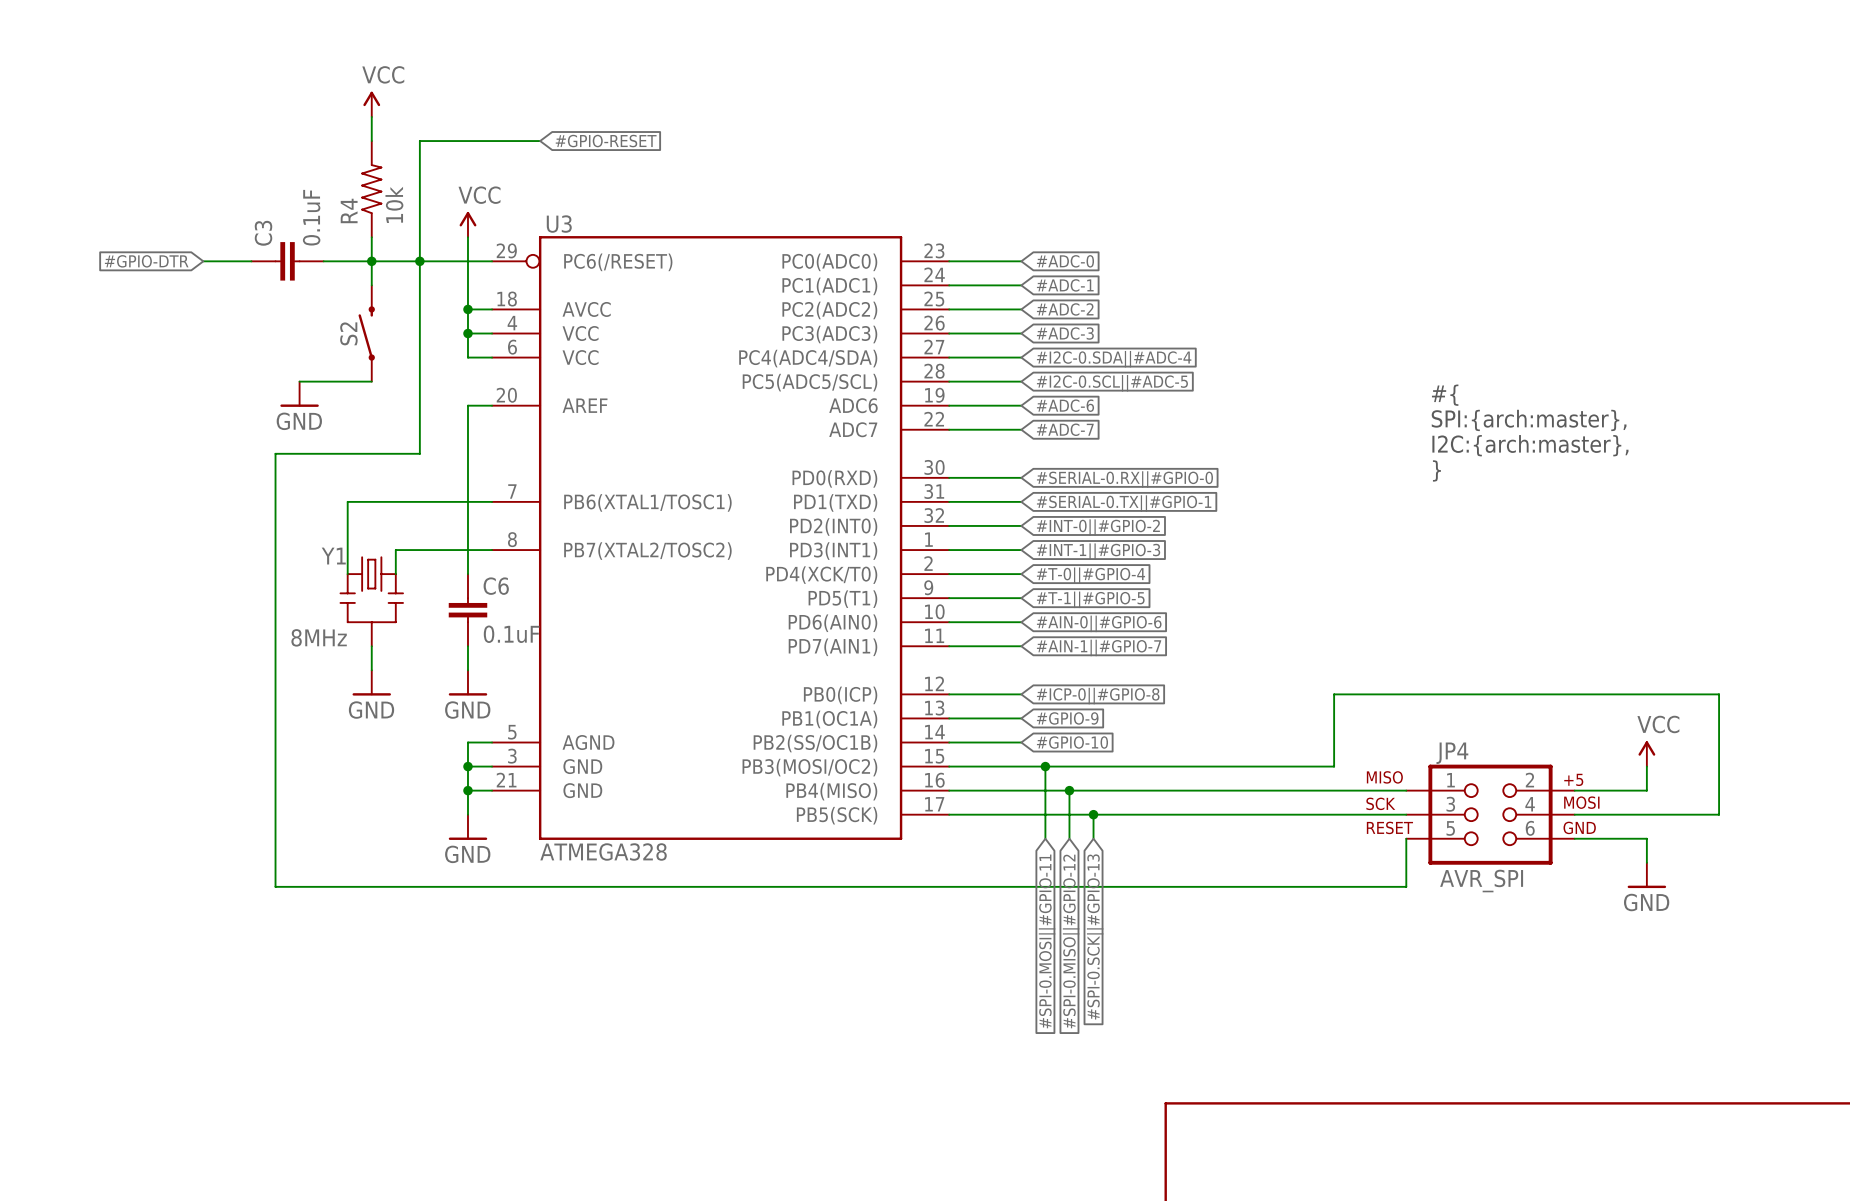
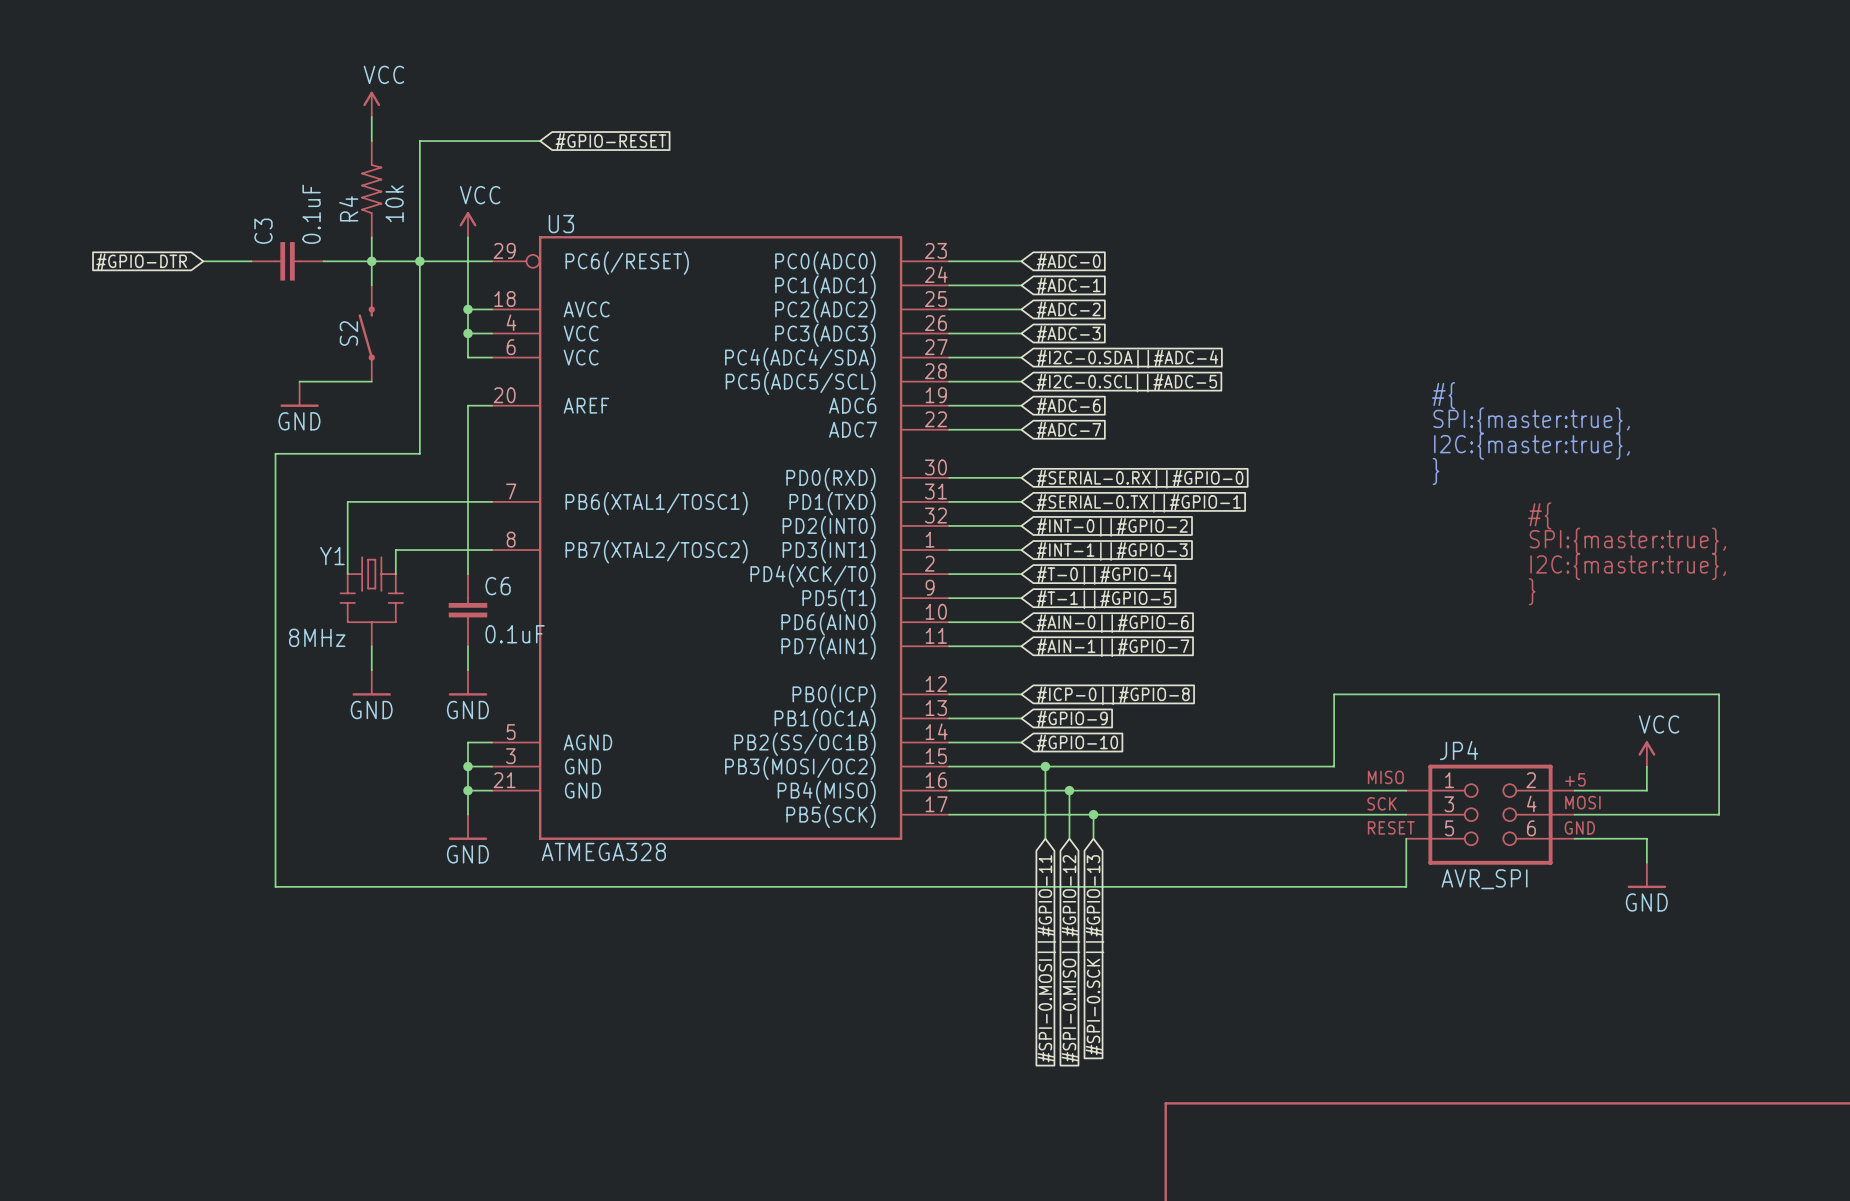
text: SPI:{arch:master}, (1529, 420) -> SPI:{master:true}, (1531, 420)
text: I2C:{arch:master}, (1530, 445) -> I2C:{master:true}, (1531, 446)
text: none -> #{ (1539, 515)
text: none -> SPI:{master:true}, (1627, 541)
text: none -> I2C:{master:true}, (1628, 566)
text: none -> } (1532, 591)

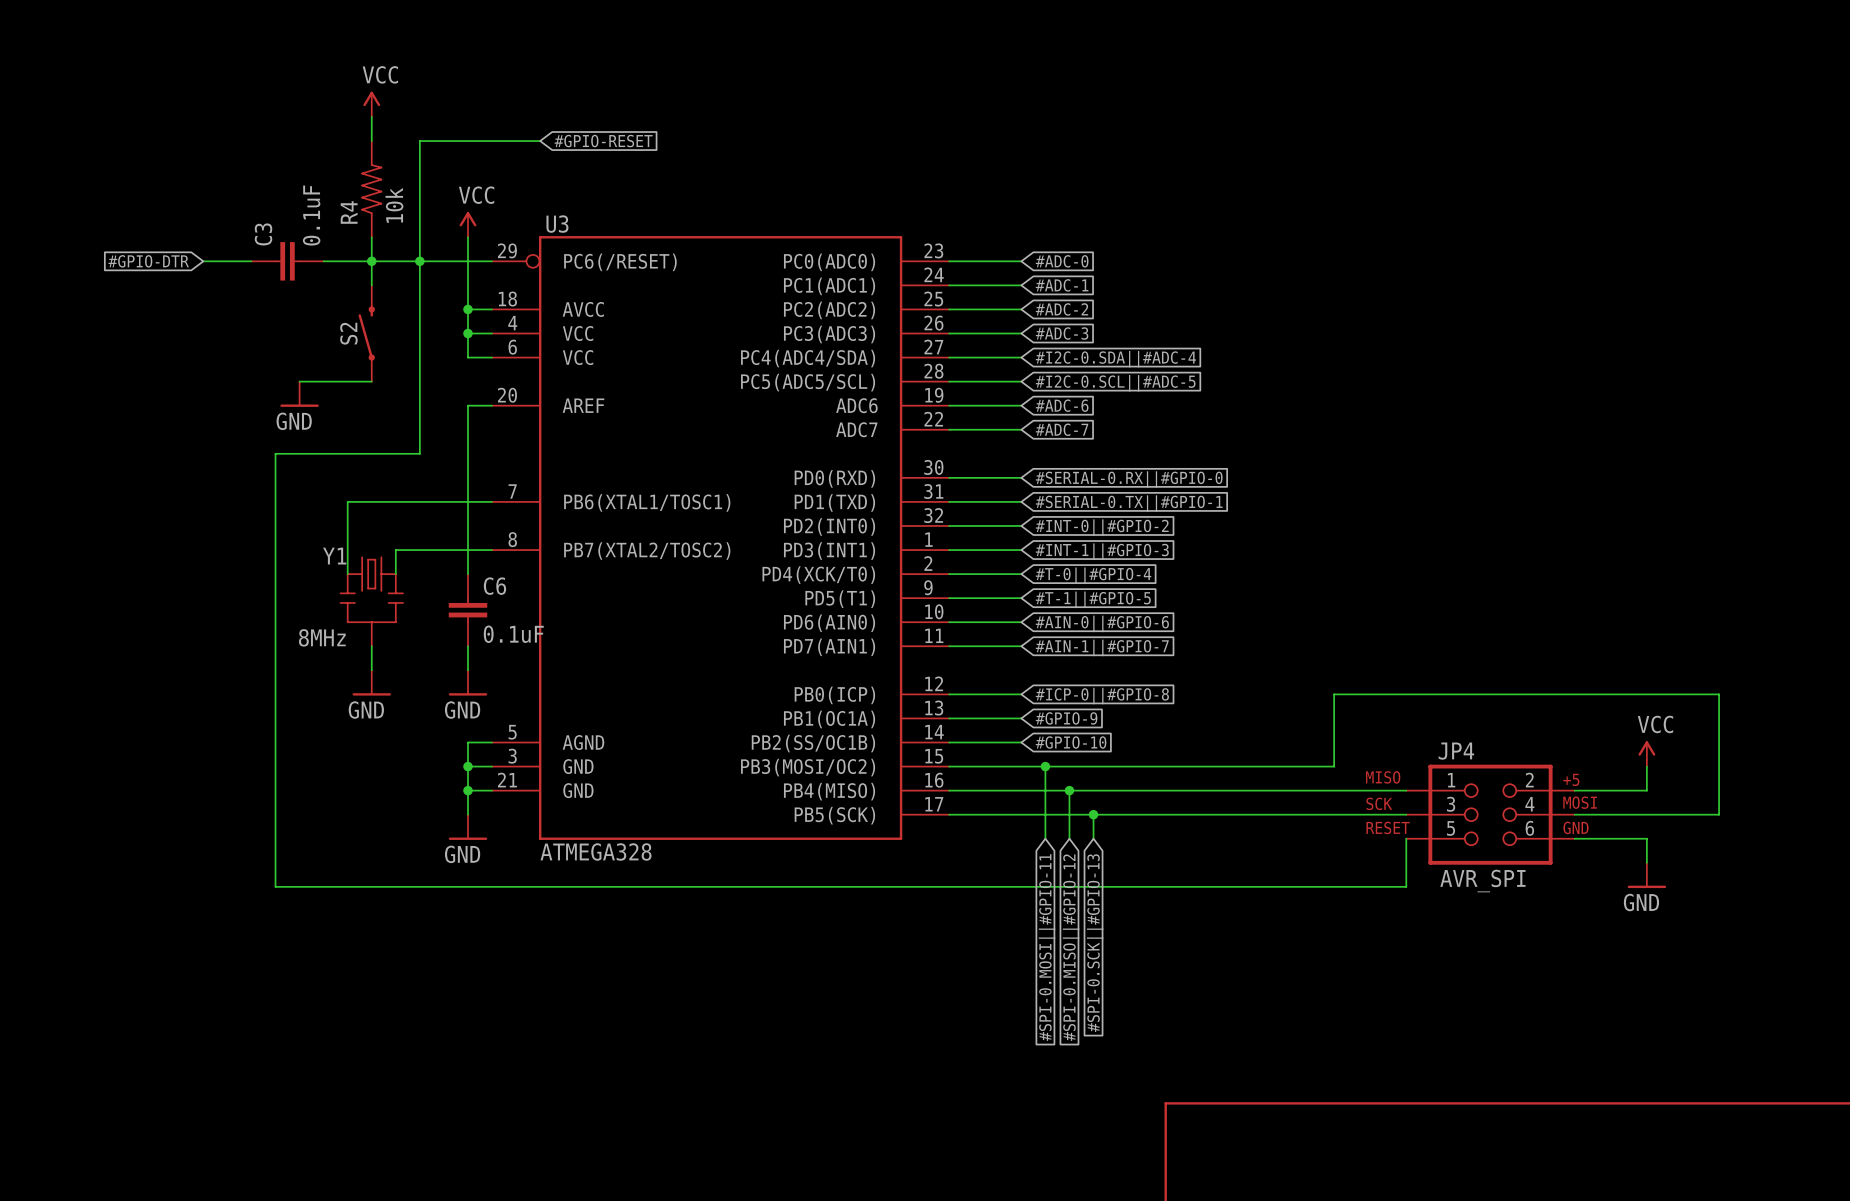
text: #{ (1443, 395) -> none
text: SPI:{master:true}, (1531, 420) -> none
text: I2C:{master:true}, (1531, 446) -> none
text: } (1435, 471) -> none
text: #{ (1539, 515) -> none
text: SPI:{master:true}, (1627, 541) -> none
text: I2C:{master:true}, (1628, 566) -> none
text: } (1532, 591) -> none

